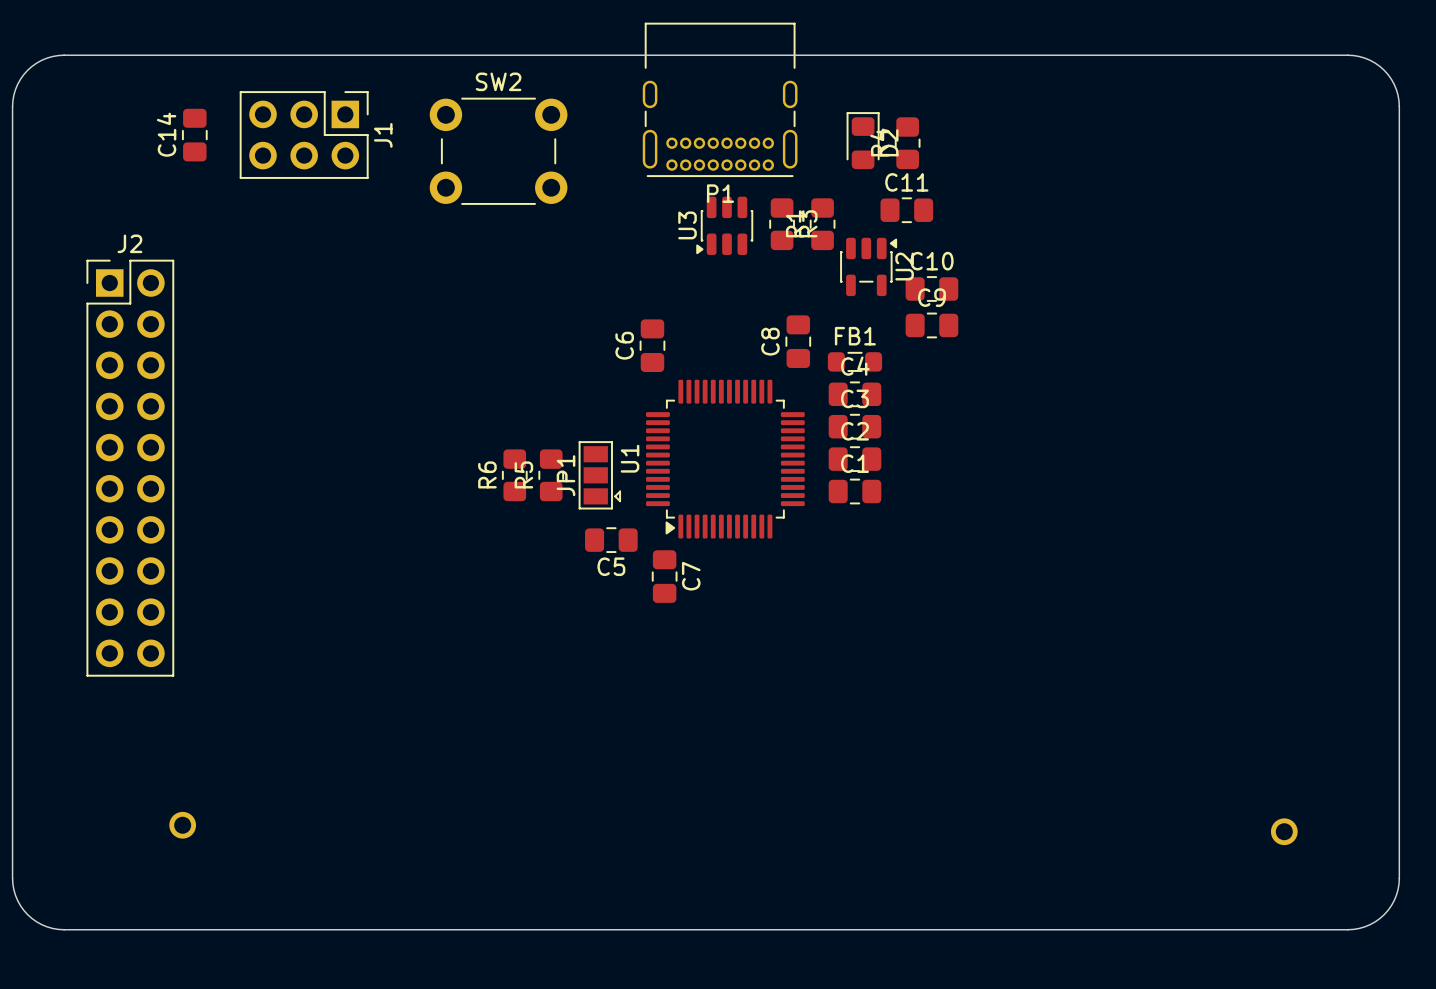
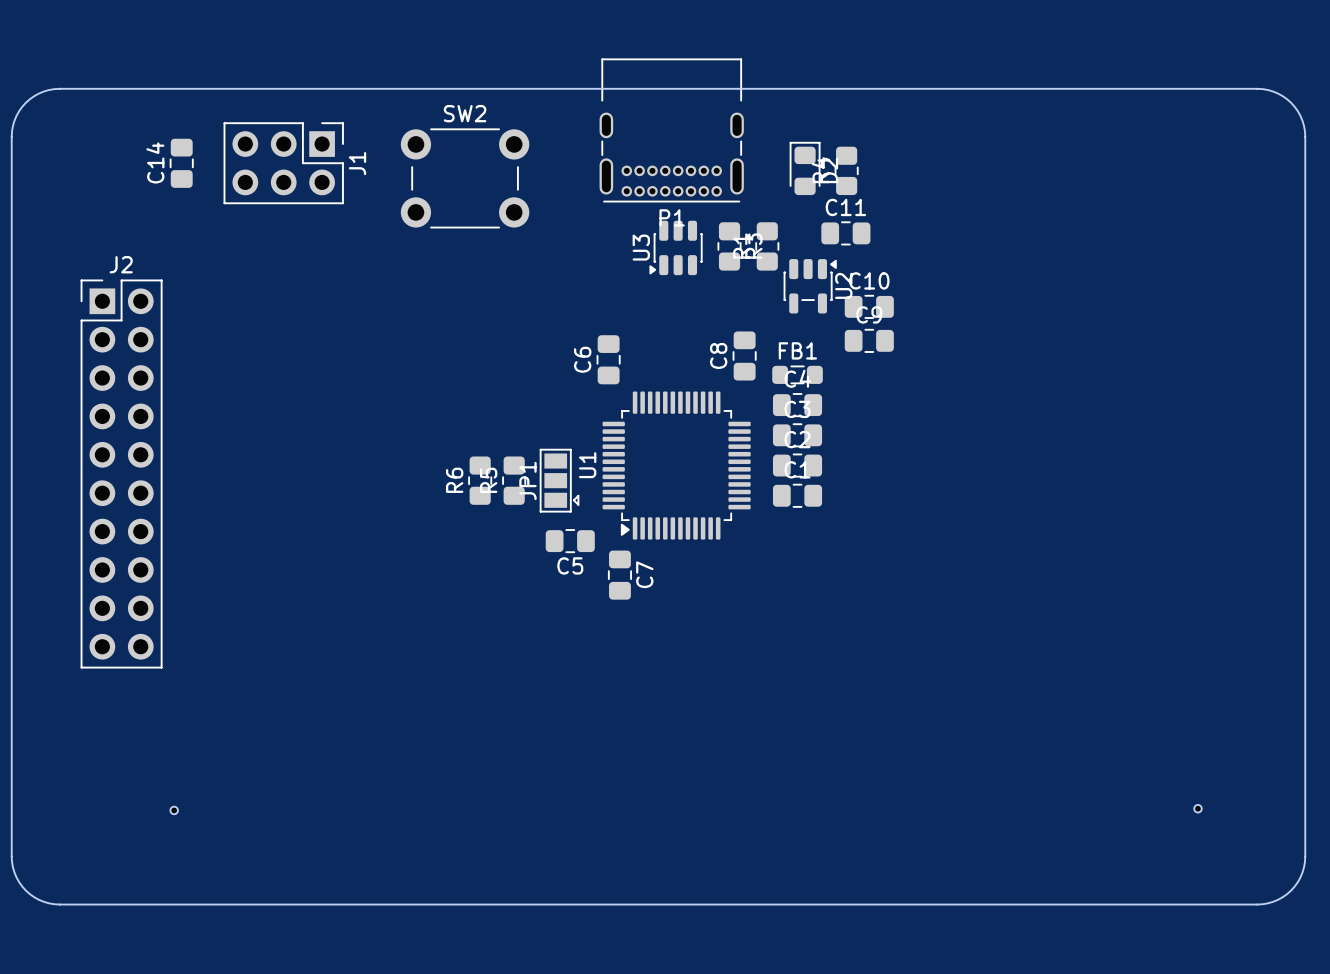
part footprint: [169, 811, 197, 839] -> [170, 806, 178, 815]
part footprint: [1270, 818, 1298, 846] -> [1194, 804, 1202, 813]

